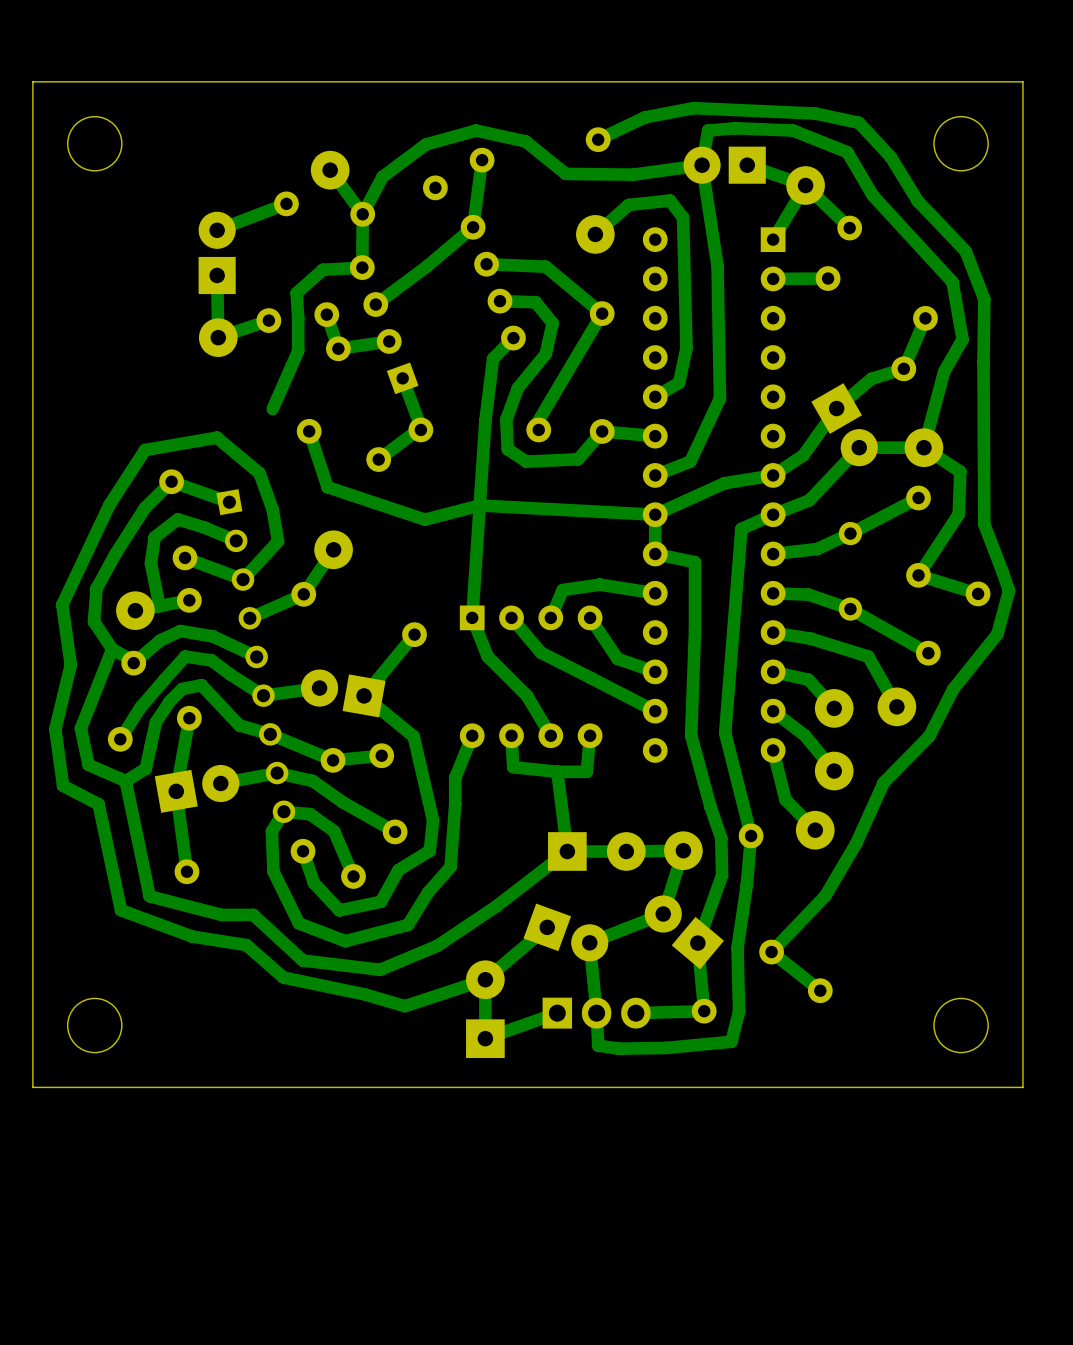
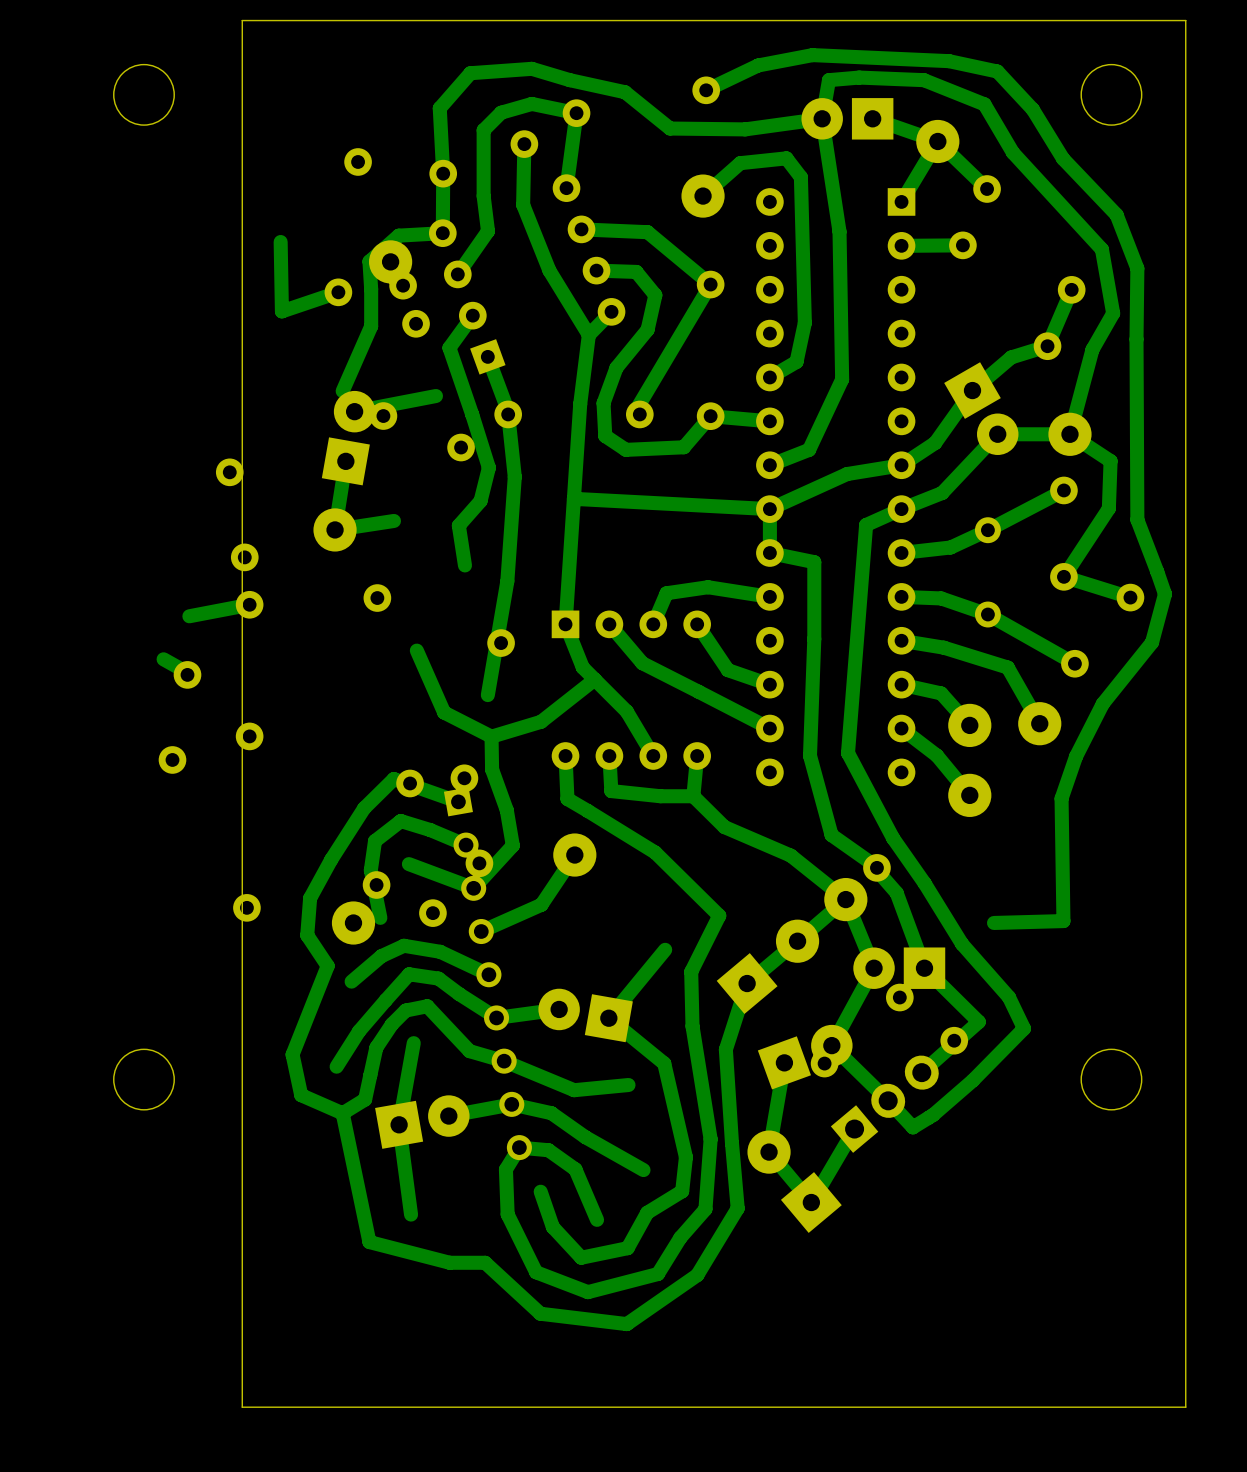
board edge: (1022, 81) (32, 81) (32, 1087) (1022, 1087) (1022, 81) -> (1185, 20) (1185, 1407) (242, 1407) (242, 20) (1185, 20)
track: (476, 130) (425, 144) (382, 176) (362, 214) (330, 170) -> (569, 80) (531, 68) (470, 73) (439, 108) (443, 173)
part: (330, 170) -> none
track: none -> (524, 144) (523, 204) (549, 270) (588, 334)
track: (286, 203) (217, 230) -> none
track: (473, 227) (426, 266) (375, 304) -> (576, 113) (531, 103) (501, 112) (483, 130) (483, 196) (488, 231) (457, 274)
part: (217, 252) -> none
part: none -> (390, 261)
track: (326, 314) (338, 348) (389, 341) -> (464, 565) (458, 525) (480, 501) (488, 467) (449, 347) (472, 315)
part: (218, 337) -> none
track: none -> (435, 396) (354, 411)
track: (421, 427) (378, 459) -> none
track: none -> (508, 414) (514, 476) (507, 581) (487, 695)
track: (309, 431) (327, 487) (425, 519) (479, 505) -> none
part: none -> (348, 438)
track: none -> (345, 461) (335, 529) (393, 520)
track: (229, 502) (171, 481) (144, 507) (115, 553) (96, 588) (93, 621) (112, 649) (80, 728) (88, 764) (125, 781) -> (458, 801) (393, 779) (364, 808) (331, 859) (310, 898) (307, 935) (327, 966) (292, 1054) (301, 1095) (342, 1113)
track: (236, 540) (204, 527) (177, 519) (154, 537) (150, 563) (159, 606) -> (466, 845) (430, 830) (400, 821) (375, 841) (370, 870) (380, 917)
track: (333, 549) (303, 594) (249, 618) -> (574, 855) (541, 904) (481, 931)
part position: (333, 549) -> (335, 529)
track: (185, 557) (243, 579) (278, 541) (272, 509) (259, 473) (216, 437) (145, 450) (109, 504) (62, 604) (70, 665) (55, 729) (63, 785) (98, 804) (121, 910) (192, 936) (246, 945) (283, 977) (365, 994) (404, 1006) (485, 979) -> none
part: (135, 610) -> none
track: (414, 634) (364, 695) (413, 736) (433, 820) (429, 850) (398, 870) (380, 901) (339, 910) (313, 882) (303, 851) -> (665, 949) (608, 1018) (664, 1063) (685, 1157) (682, 1191) (647, 1212) (627, 1248) (581, 1257) (552, 1227) (540, 1191)
track: none -> (416, 650) (444, 712) (491, 736)
part position: (255, 656) -> (487, 973)
track: (256, 656) (213, 636) (180, 631) (160, 640) (133, 663) -> (488, 974) (440, 951) (403, 945) (381, 956) (351, 981)
track: none -> (594, 679) (541, 721) (491, 736)
track: (319, 688) (263, 695) (211, 660) (185, 656) (140, 707) (120, 739) -> (559, 1009) (496, 1017) (438, 978) (409, 974) (359, 1031) (336, 1066)
part: (343, 693) -> none
track: (189, 718) (176, 791) (186, 871) -> (413, 1043) (399, 1124) (411, 1214)
track: none -> (491, 736) (492, 769) (506, 810) (512, 845) (473, 888) (408, 864)
track: (725, 733) (751, 835) (746, 884) (737, 948) (739, 1011) (731, 1041) (666, 1047) (619, 1048) (598, 1045) (589, 942) (663, 914) (683, 850) (567, 851) -> (847, 753) (893, 838) (924, 883) (962, 944) (1008, 997) (1024, 1028) (972, 1080) (933, 1115) (912, 1127) (831, 1045) (874, 968) (845, 899)
track: (472, 735) (455, 777) (450, 866) (428, 892) (408, 924) (345, 941) (298, 923) (273, 871) (271, 831) (283, 811) (310, 814) (334, 831) (353, 876) -> (565, 756) (567, 799) (655, 852) (719, 915) (691, 971) (692, 1026) (710, 1139) (705, 1209) (680, 1237) (657, 1274) (587, 1292) (536, 1272) (507, 1214) (505, 1169) (519, 1147) (548, 1150) (575, 1169) (597, 1219)
track: (929, 736) (883, 782) (856, 843) (825, 895) (771, 952) (820, 990) -> (1076, 756) (1061, 798) (1063, 921) (994, 922)
track: (773, 750) (785, 799) (815, 830) -> none
track: (381, 755) (333, 760) (270, 734) (239, 725) (201, 685) (182, 689) (169, 701) (155, 722) (145, 768) (125, 781) -> (628, 1085) (574, 1090) (504, 1061) (469, 1051) (427, 1006) (405, 1010) (391, 1024) (376, 1047) (365, 1099) (342, 1113)
track: (557, 771) (567, 851) -> none
track: none -> (693, 796) (724, 827) (790, 855) (845, 899)
track: (125, 781) (149, 896) (221, 914) (253, 914) (302, 960) (380, 969) (437, 945) (496, 906) (567, 851) -> none
track: (220, 783) (277, 773) (312, 780) (343, 802) (395, 831) -> (448, 1116) (511, 1104) (551, 1113) (585, 1137) (643, 1170)
part position: (197, 788) -> (422, 1122)
track: (710, 806) (721, 838) (722, 875) (697, 943) (704, 1011) (635, 1013) -> (831, 835) (869, 861) (896, 892) (924, 968) (978, 1021) (921, 1072)
part: none -> (574, 855)
part: (815, 830) -> none
part position: (683, 850) -> (845, 899)
part: (596, 851) -> none
track: none -> (845, 899) (747, 983) (725, 1049) (737, 1208) (697, 1275) (626, 1324) (540, 1313) (485, 1262) (449, 1262) (369, 1242) (342, 1113)
part: none -> (353, 923)
part: none -> (767, 966)
part: none -> (899, 968)
track: (547, 927) (485, 979) -> none
part: (565, 932) -> none
part: (684, 932) -> none
part: none -> (585, 1015)
track: (485, 979) (485, 1038) (557, 1013) -> none
part: none -> (805, 1057)
part: (485, 1009) -> none
track: none -> (784, 1062) (769, 1152) (811, 1202) (854, 1129)
part: (596, 1013) -> none
part: none -> (884, 1104)
part: none -> (794, 1181)

